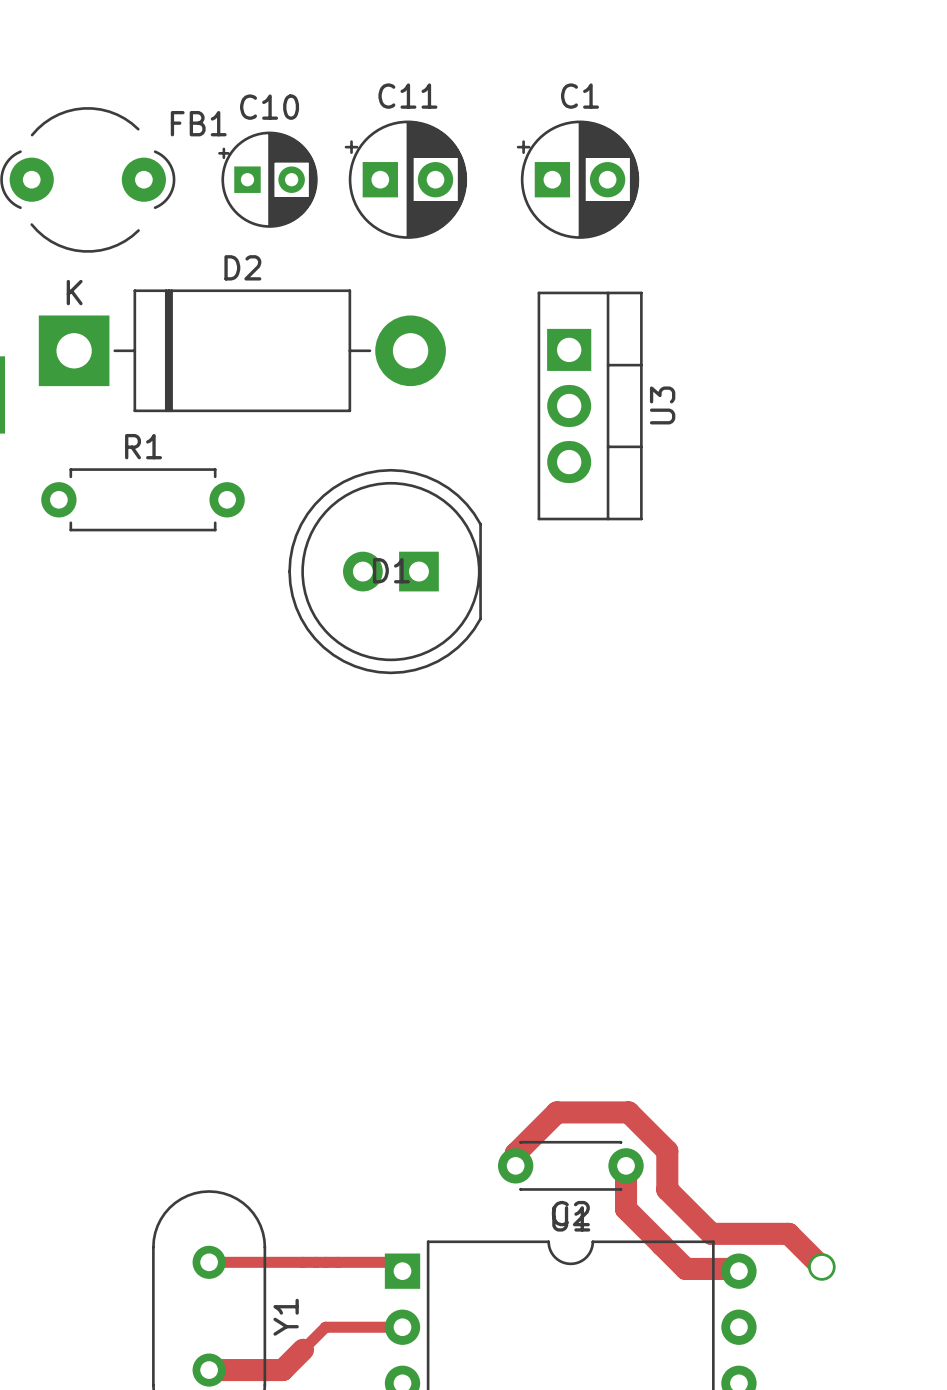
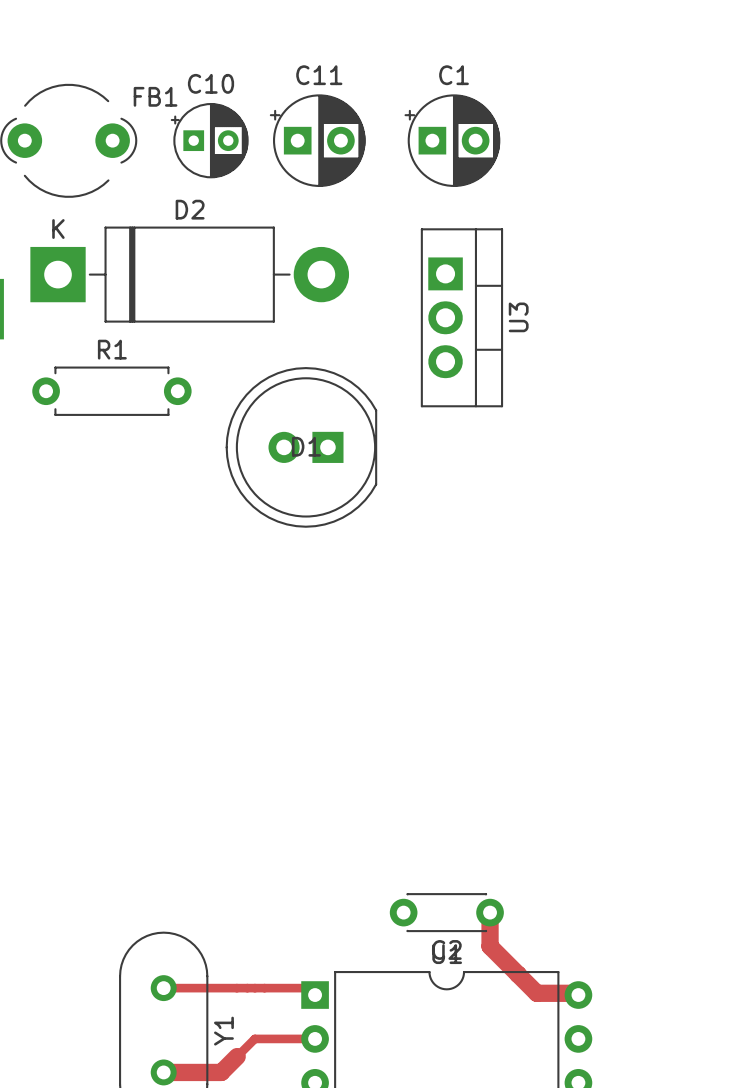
track: (515, 1165) (515, 1153) (556, 1112) (628, 1112) (667, 1151) (667, 1189) (711, 1233) (788, 1233) (821, 1266) -> none
via: (821, 1266) -> none

